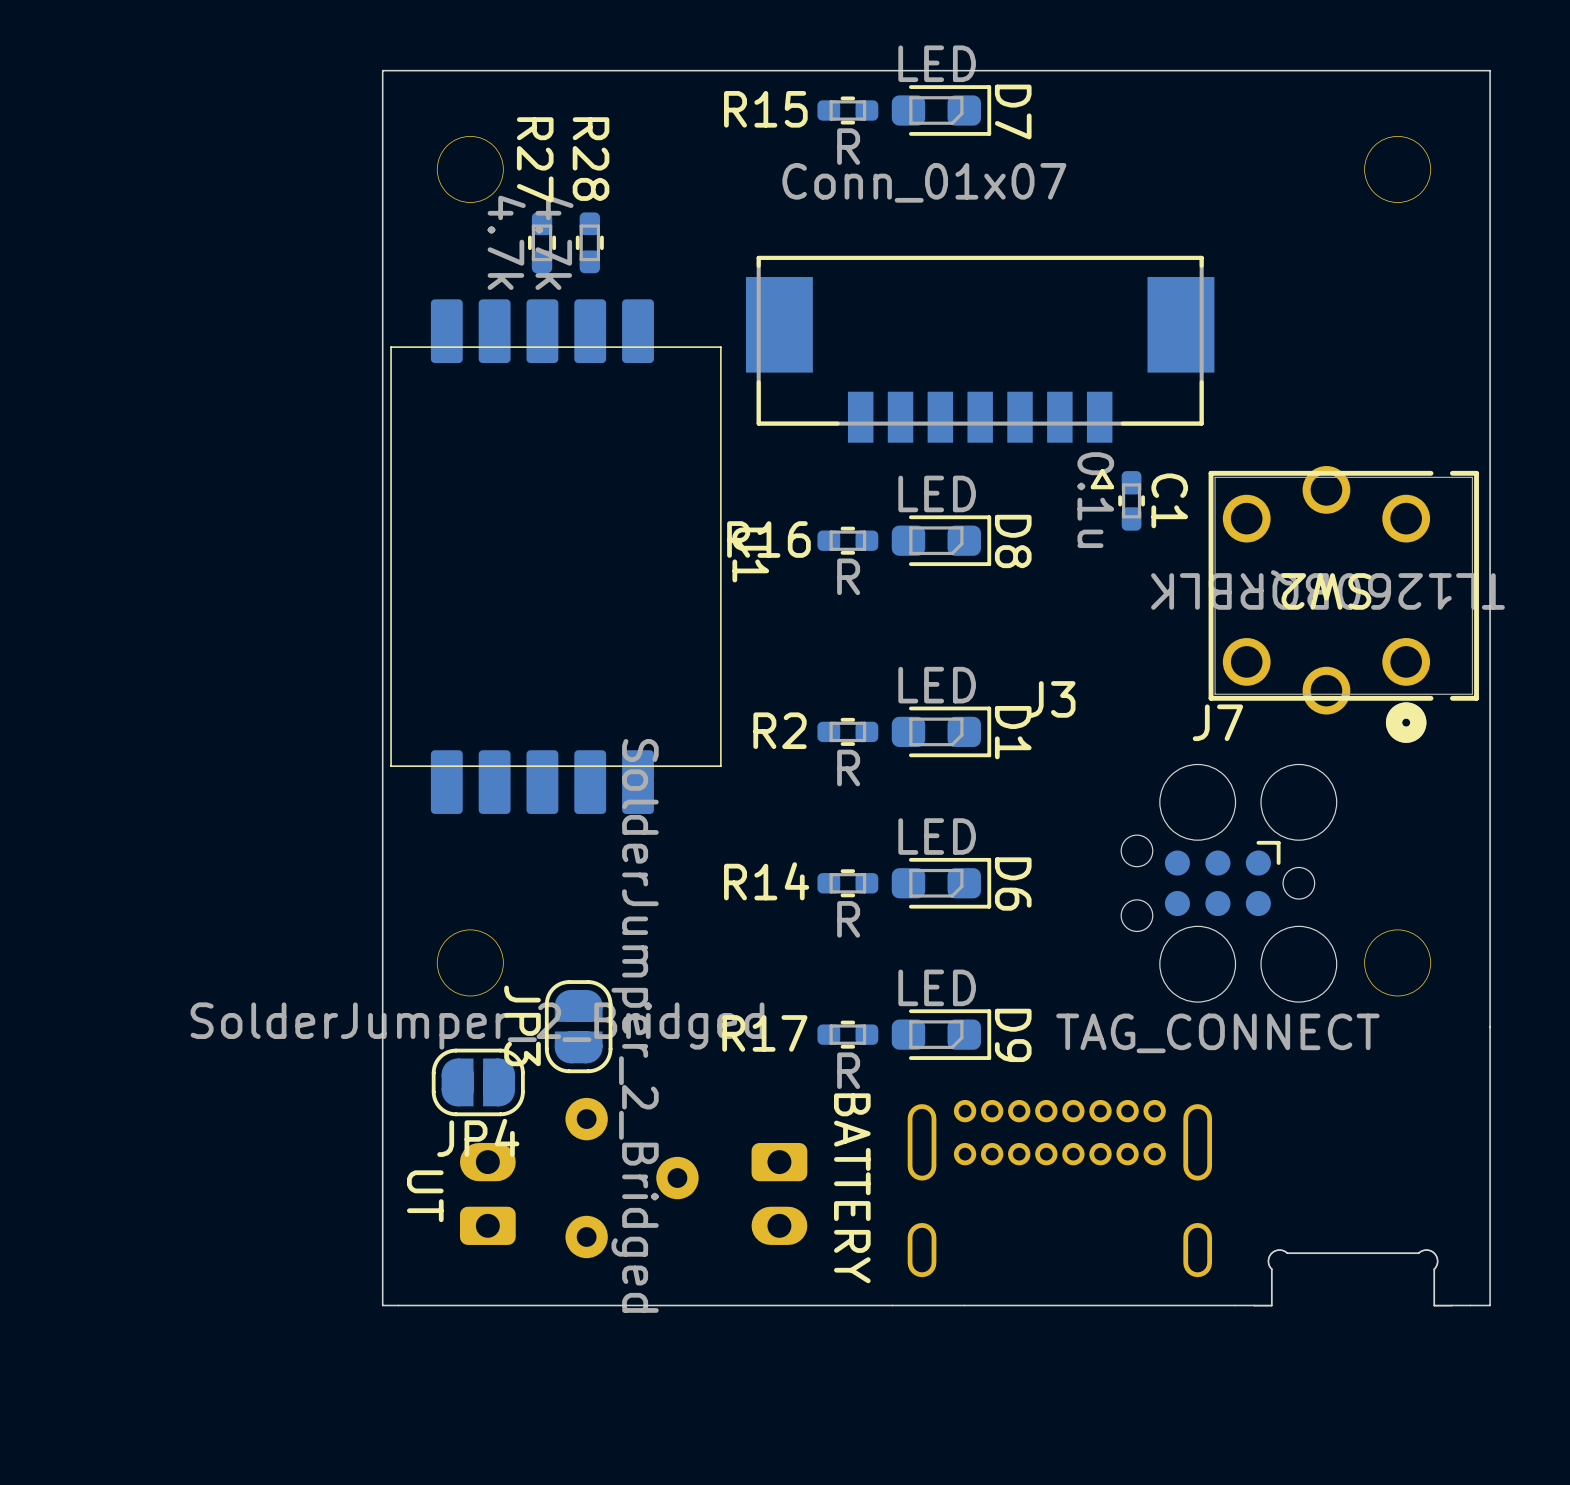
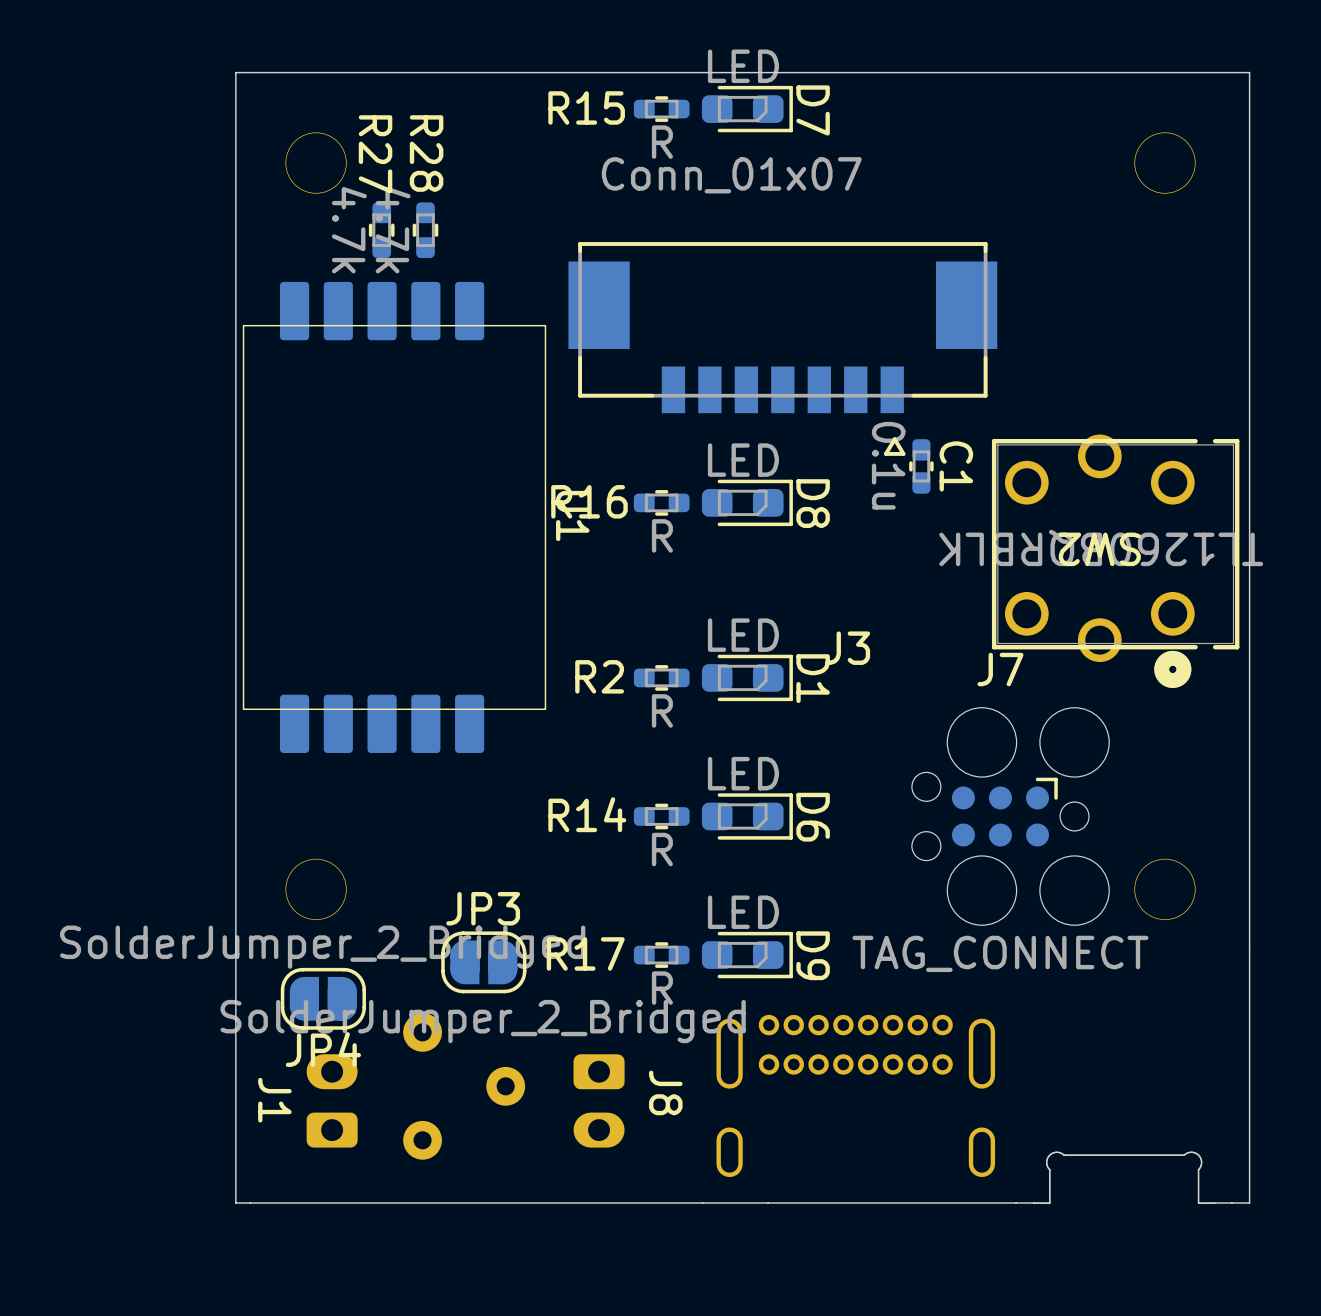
JP3 rotation: 0° (578, 1026) -> 90° clockwise (483, 962)
JP3 position: (578, 1026) -> (483, 962)
BATTERY name: BATTERY (852, 1188) -> J8 (665, 1092)
UT name: UT (425, 1196) -> J1 (274, 1100)

